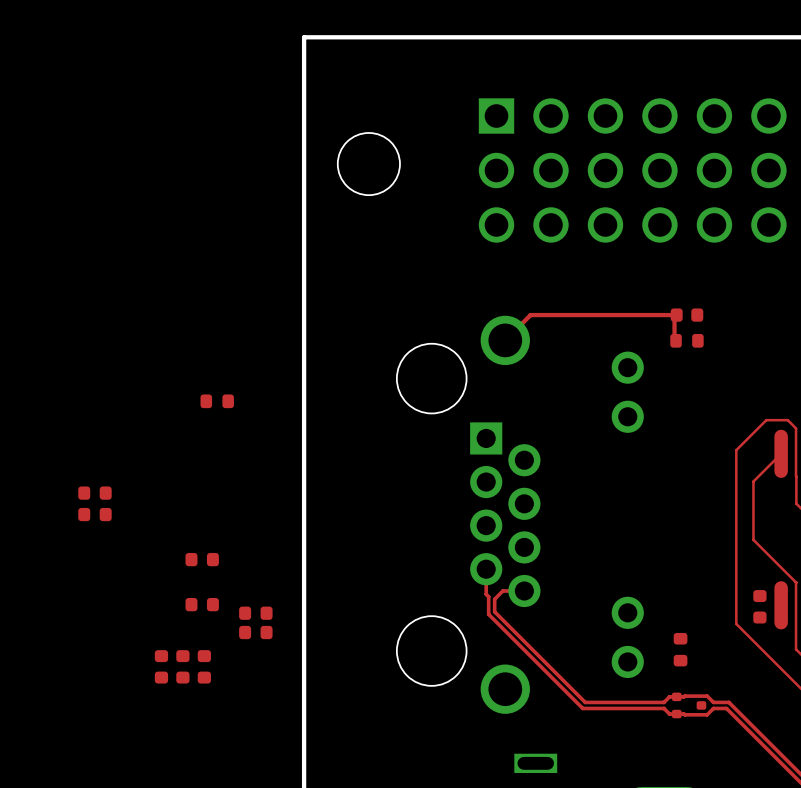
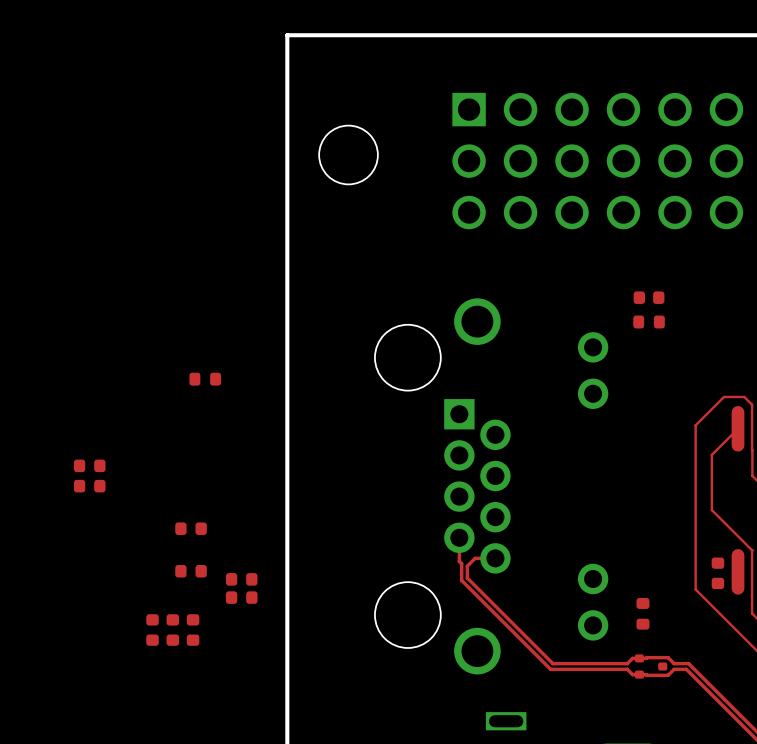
top track: (505, 340) (530, 315) (674, 315) (673, 340) -> none

